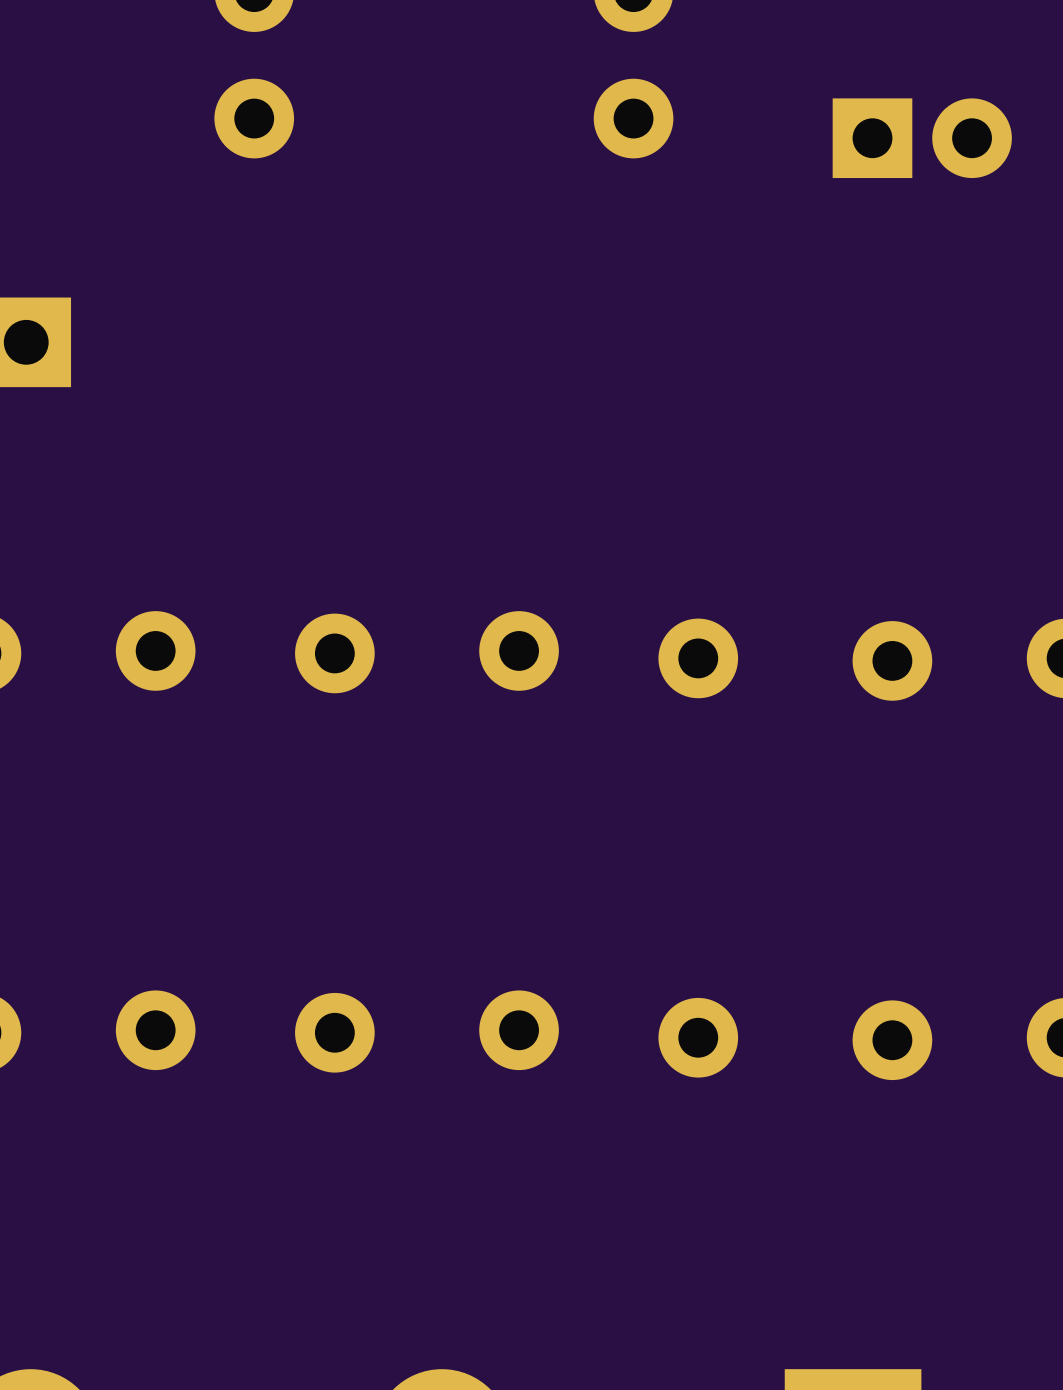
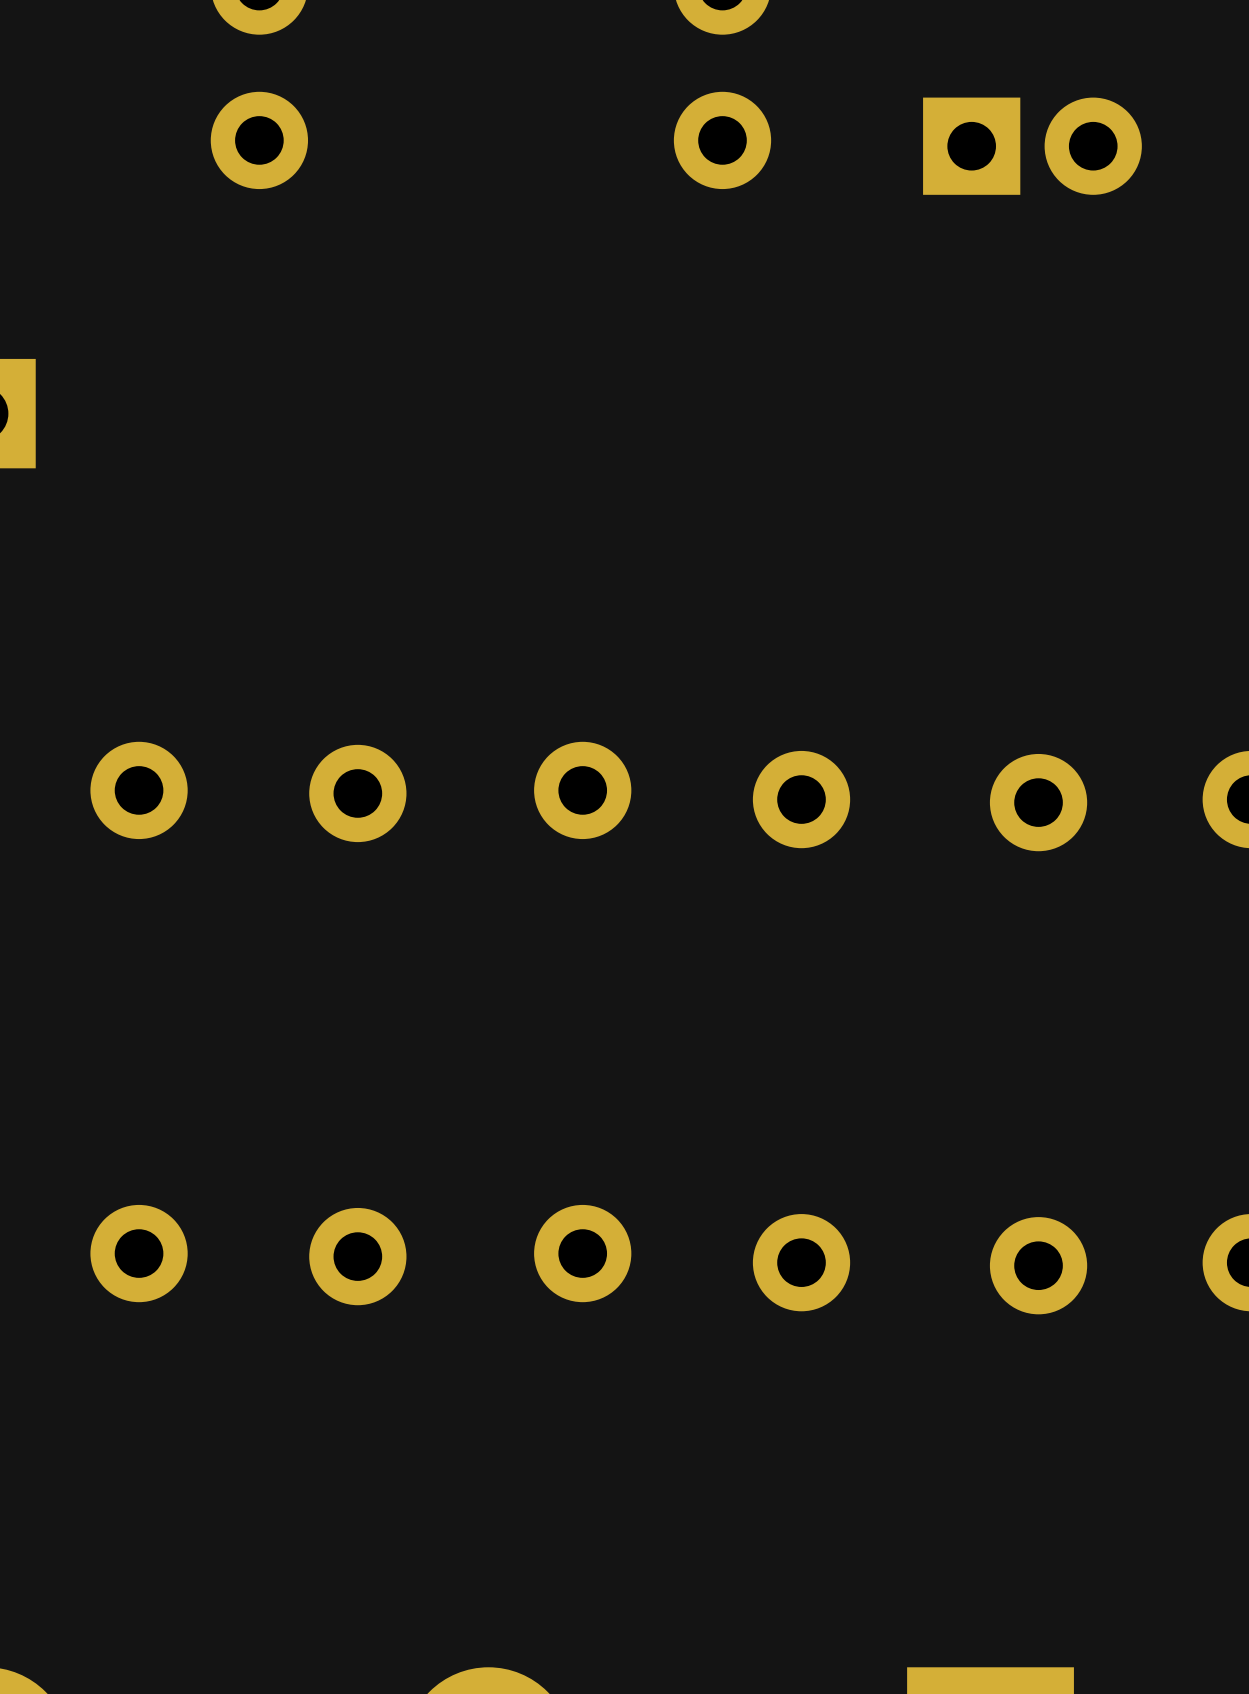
part position: (922, 138) -> (1032, 146)

